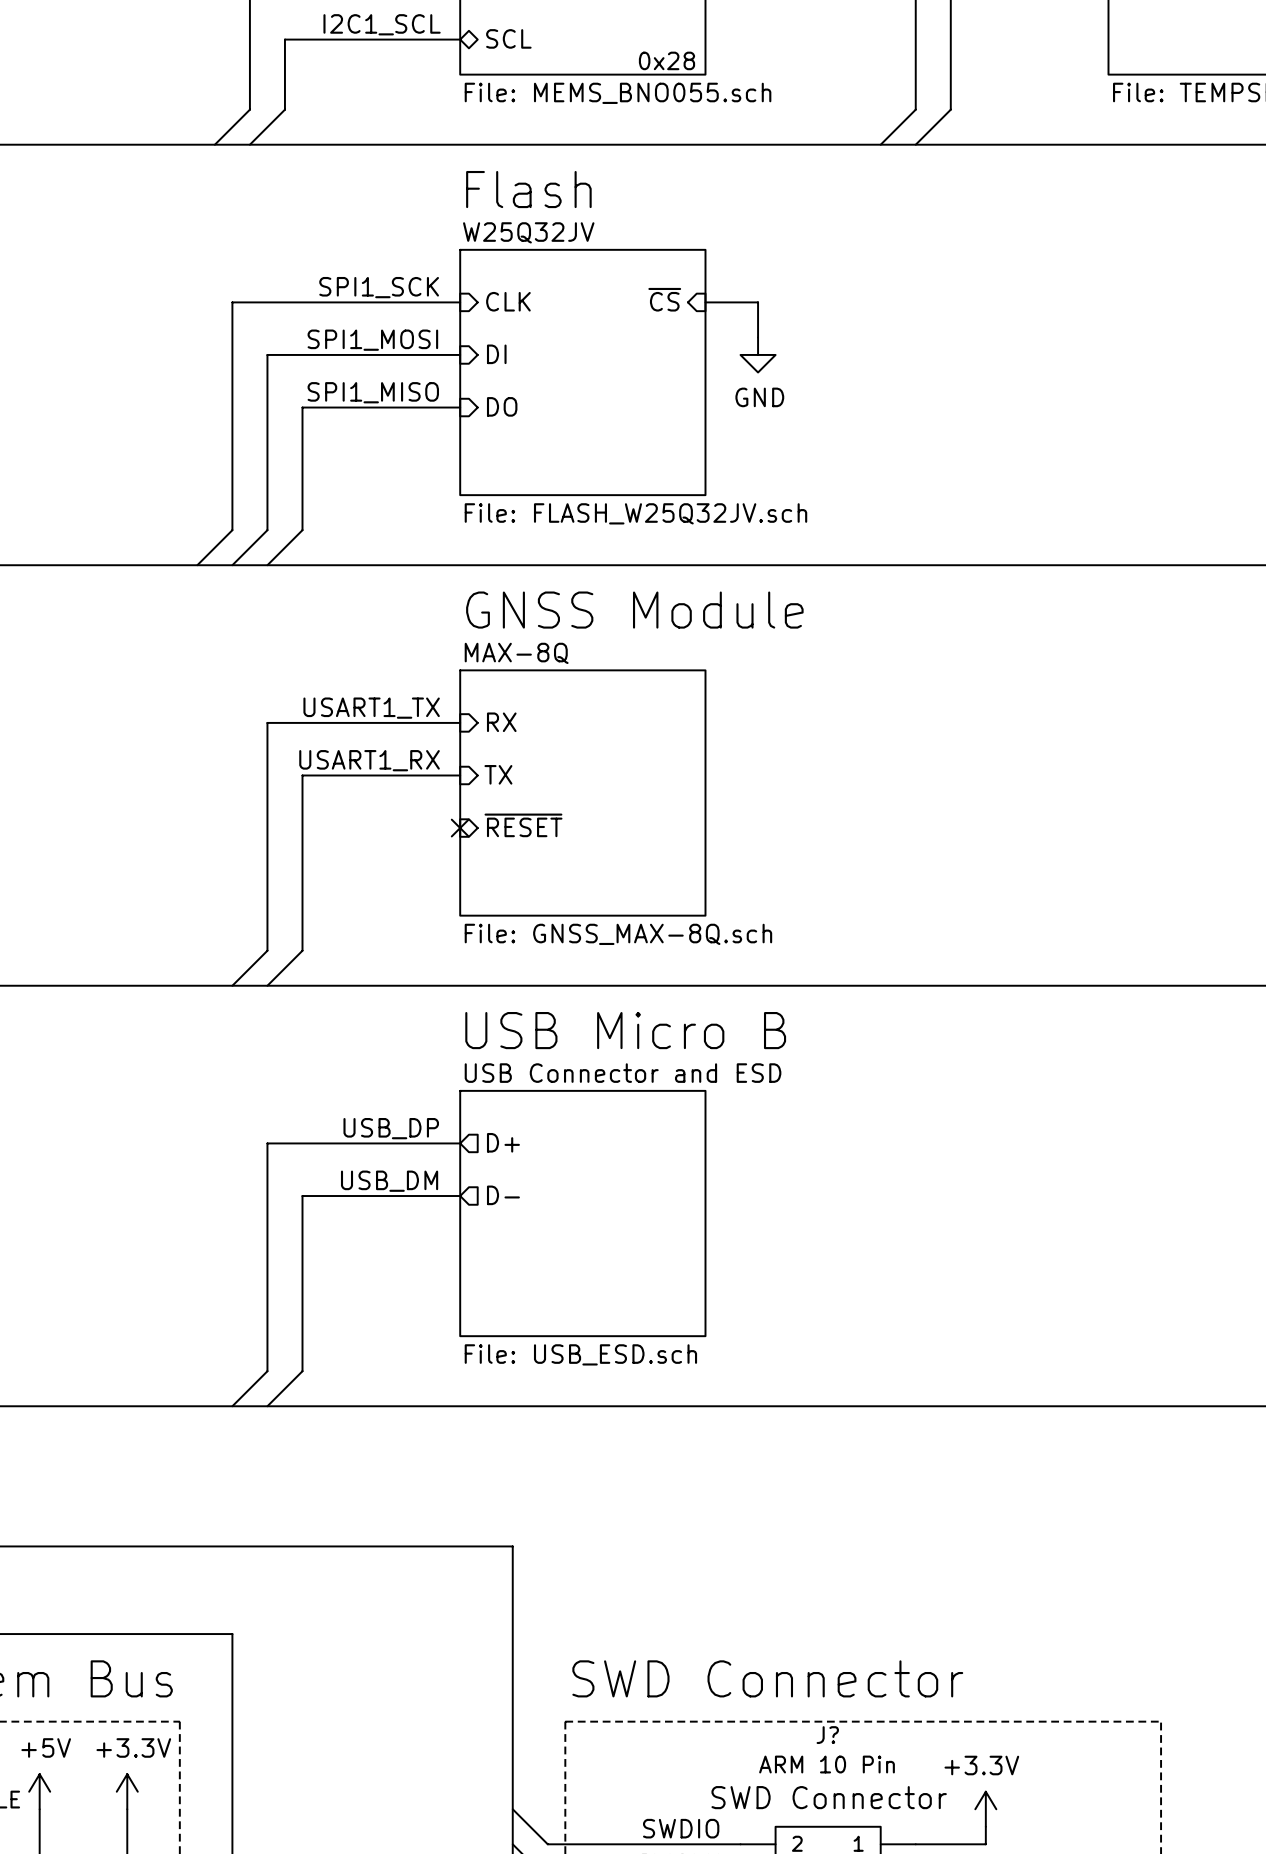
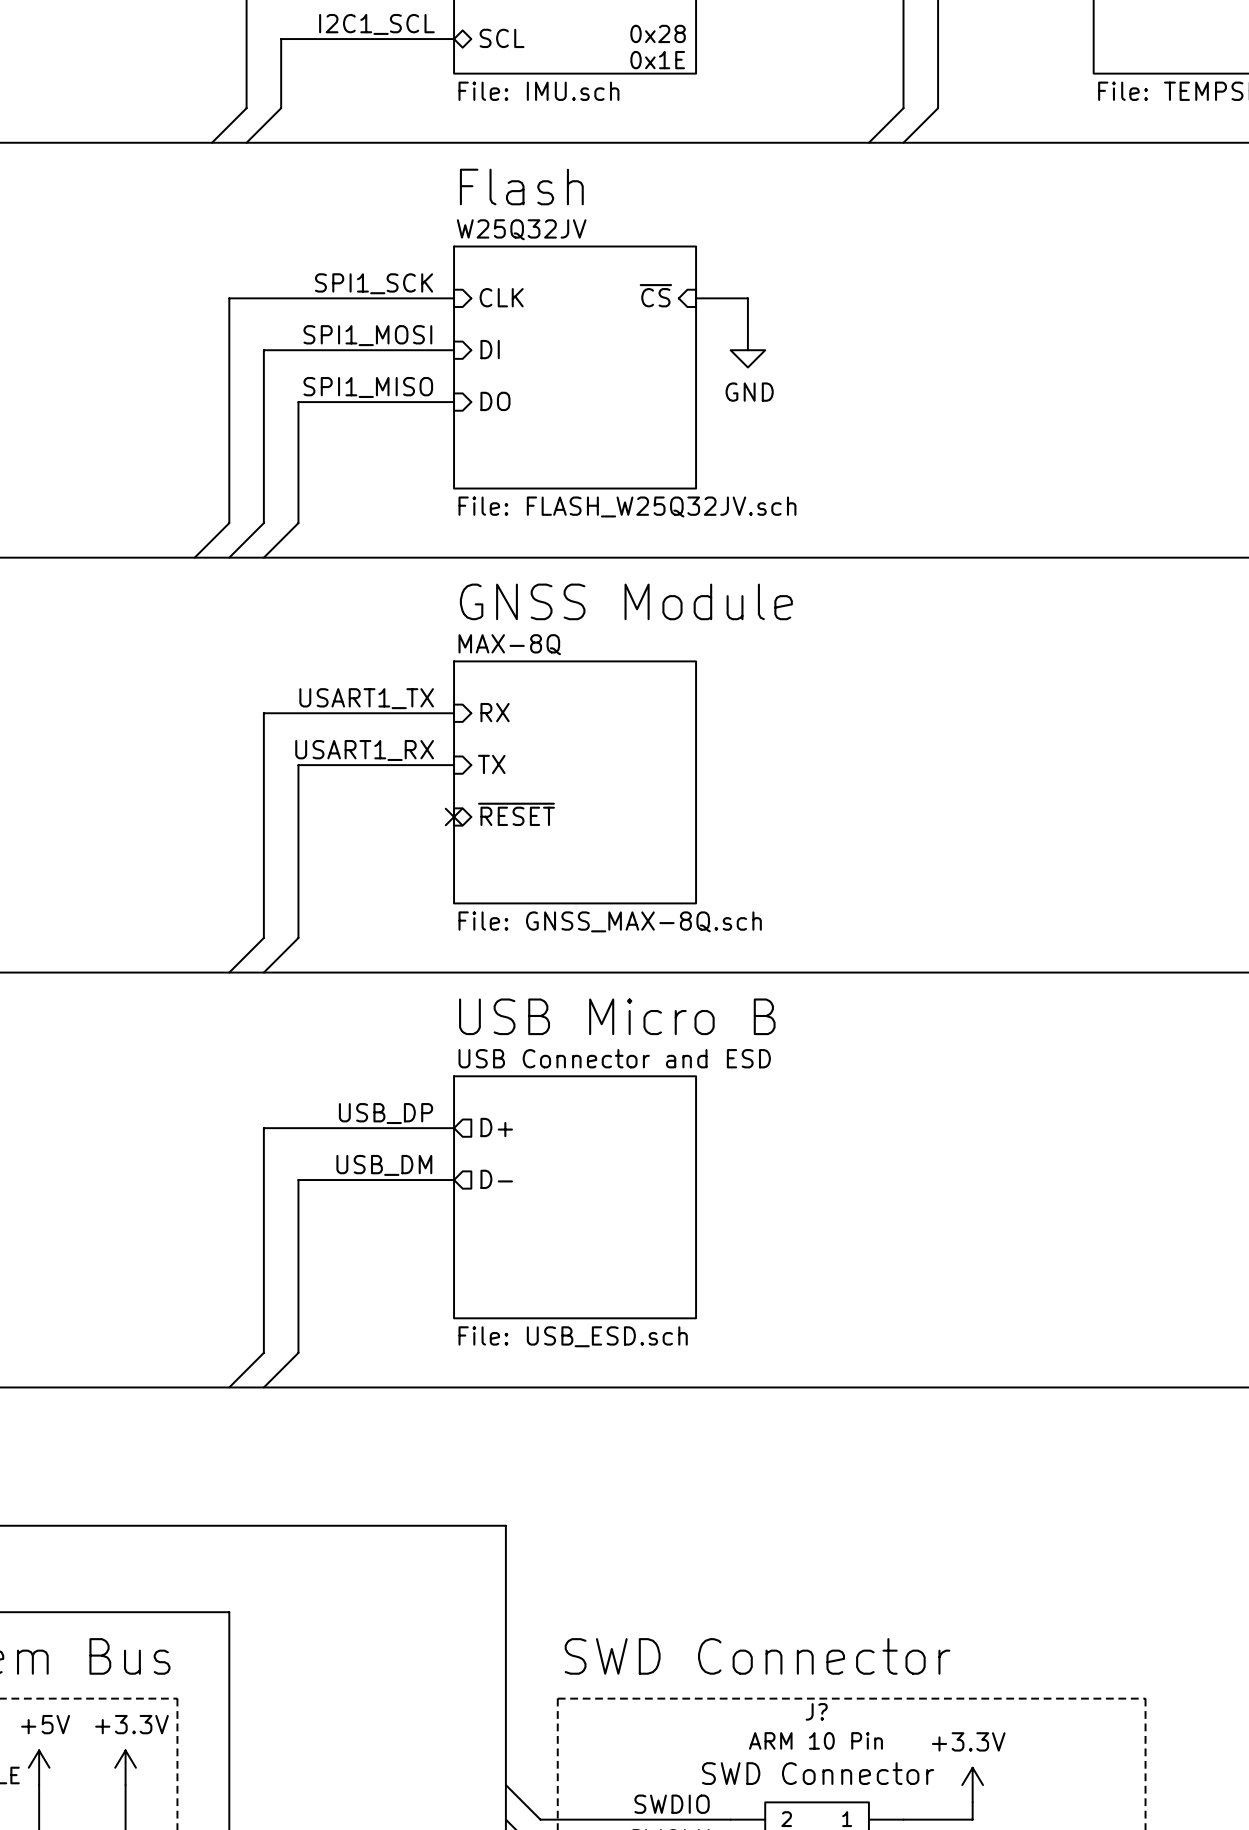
text: none -> 0x28 (658, 33)
text: 0x28 (666, 60) -> 0x1E (657, 60)
sheet value: File: MEMS_BNO055.sch (618, 93) -> File: IMU.sch (538, 91)

